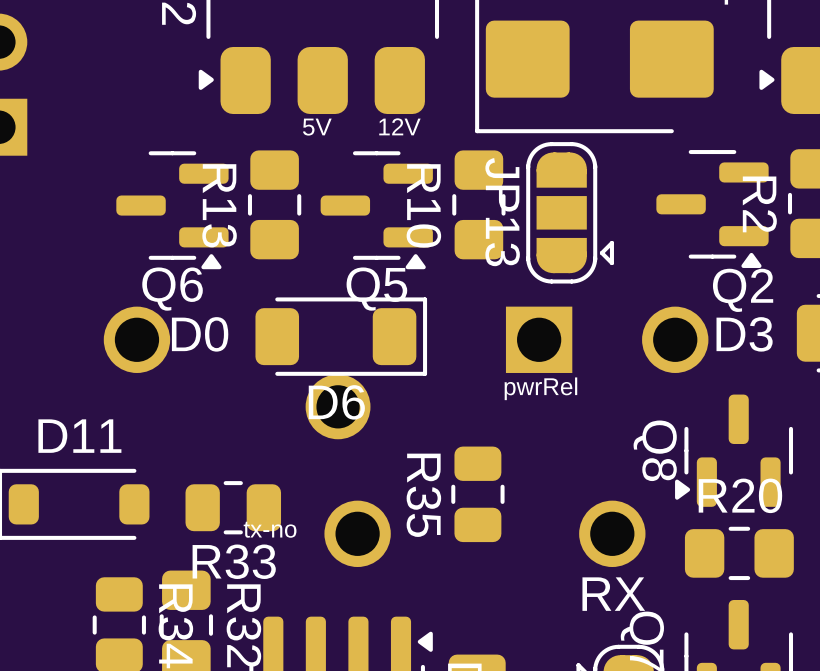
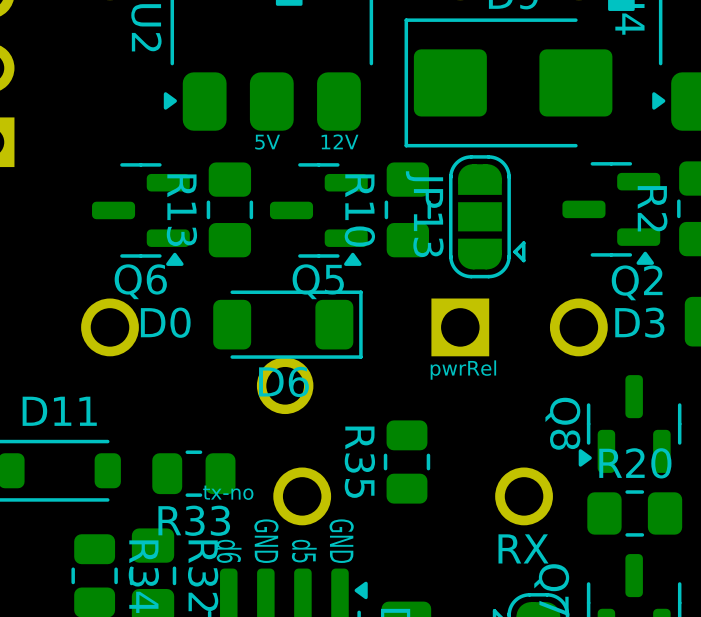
text: none -> GND (266, 541)
text: none -> GND (341, 541)
text: none -> d6 (229, 551)
text: none -> d5 (304, 551)

